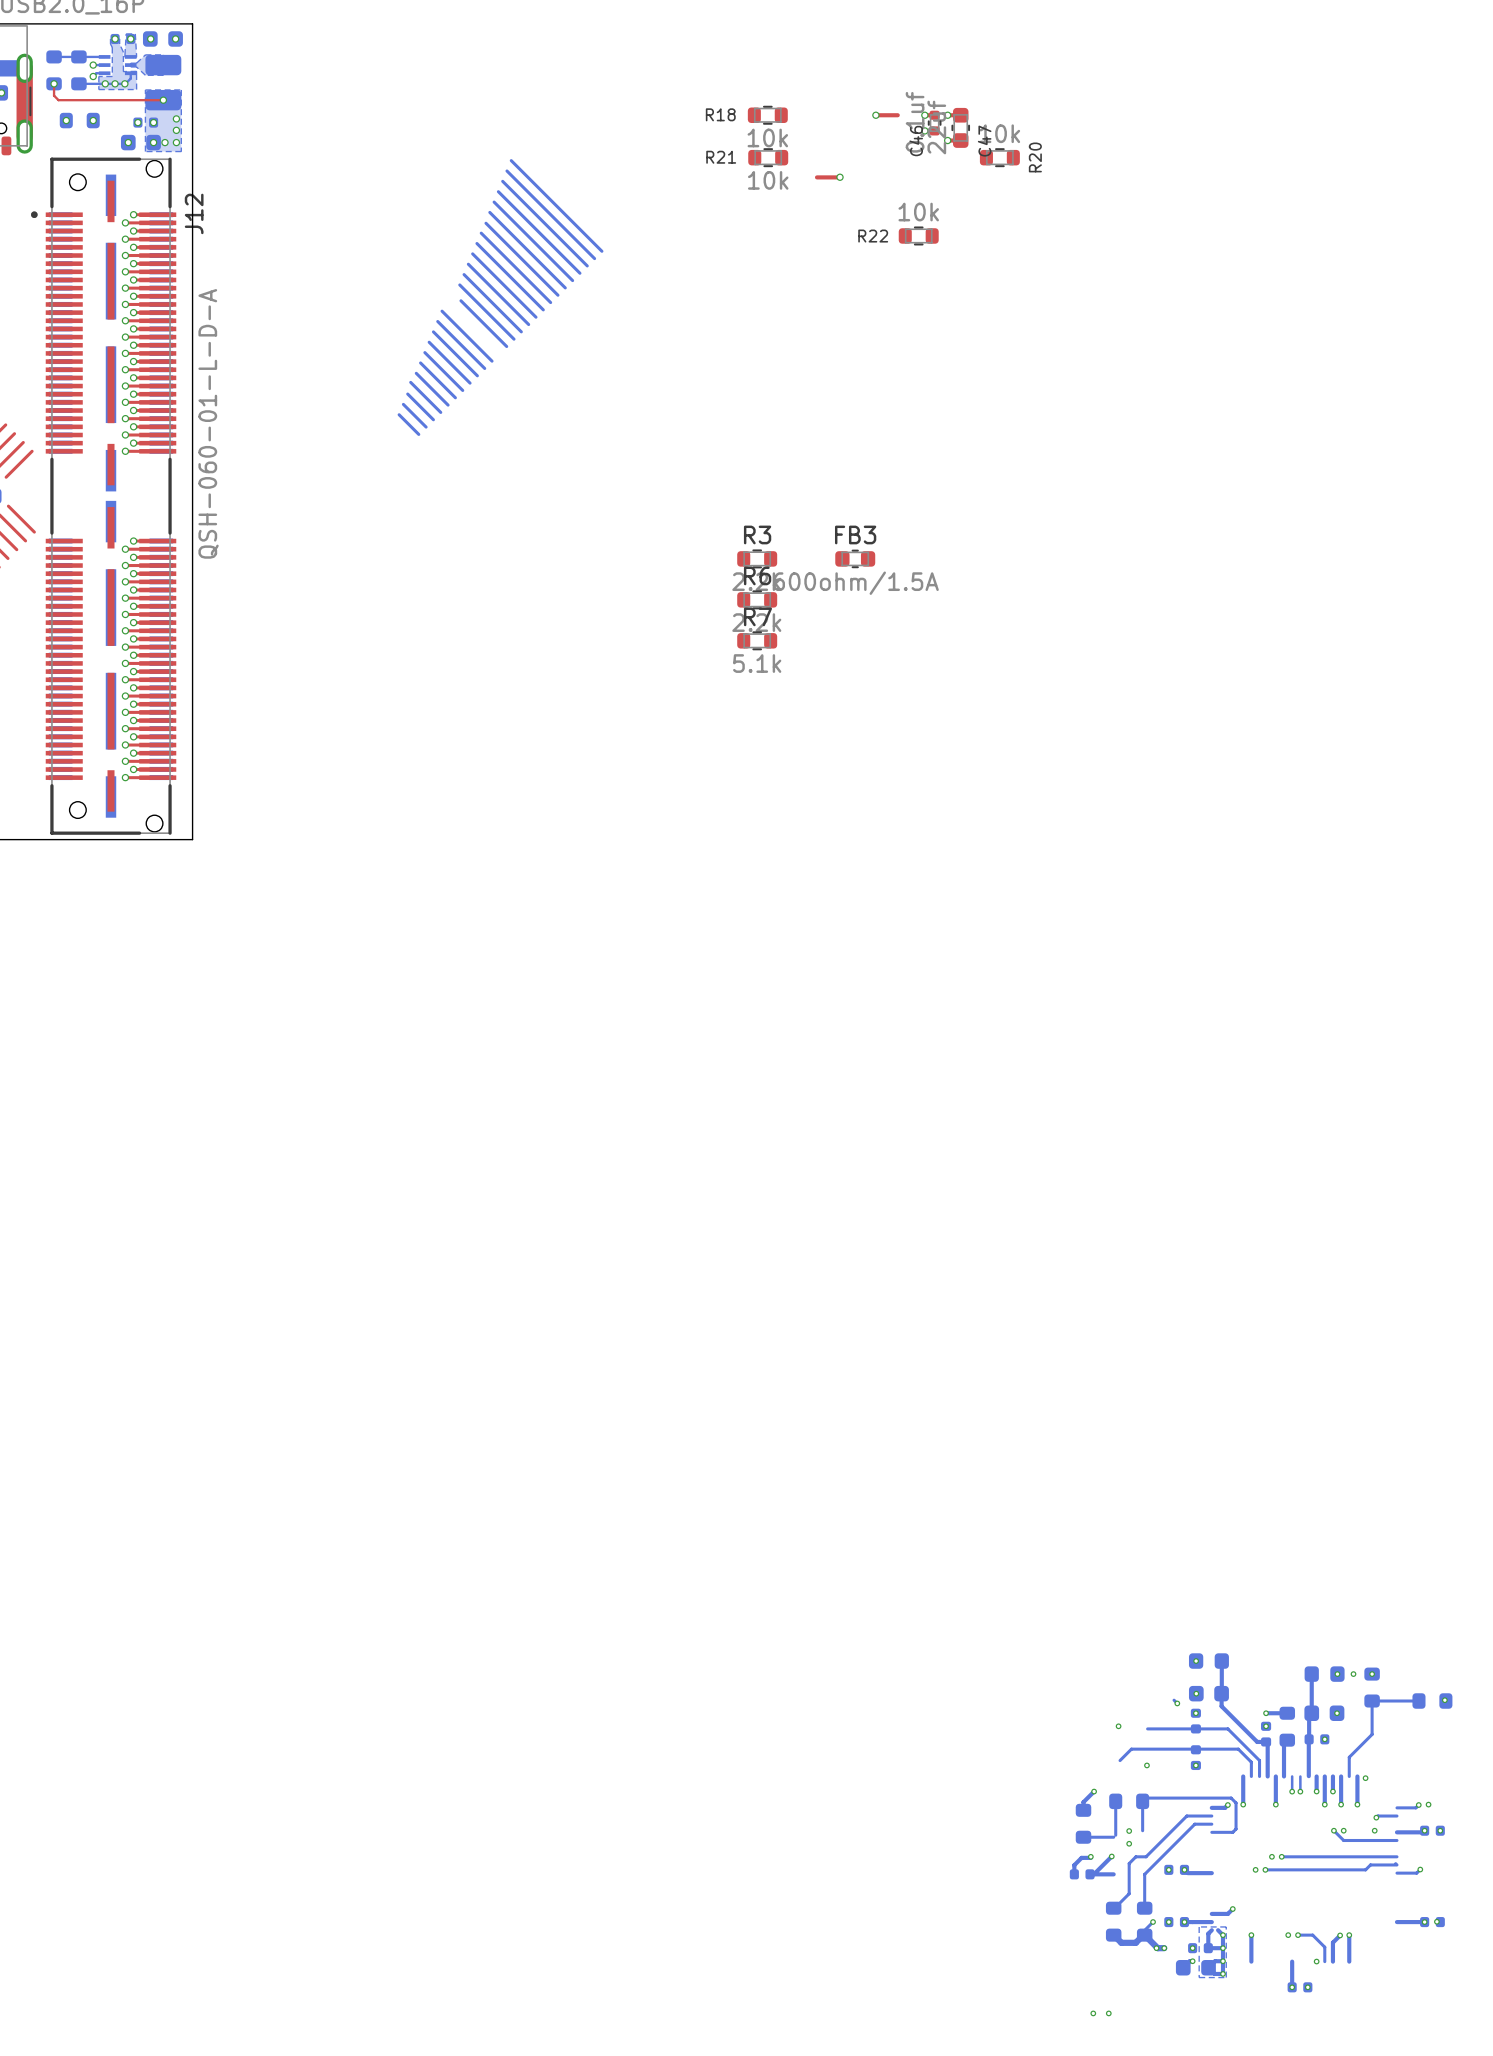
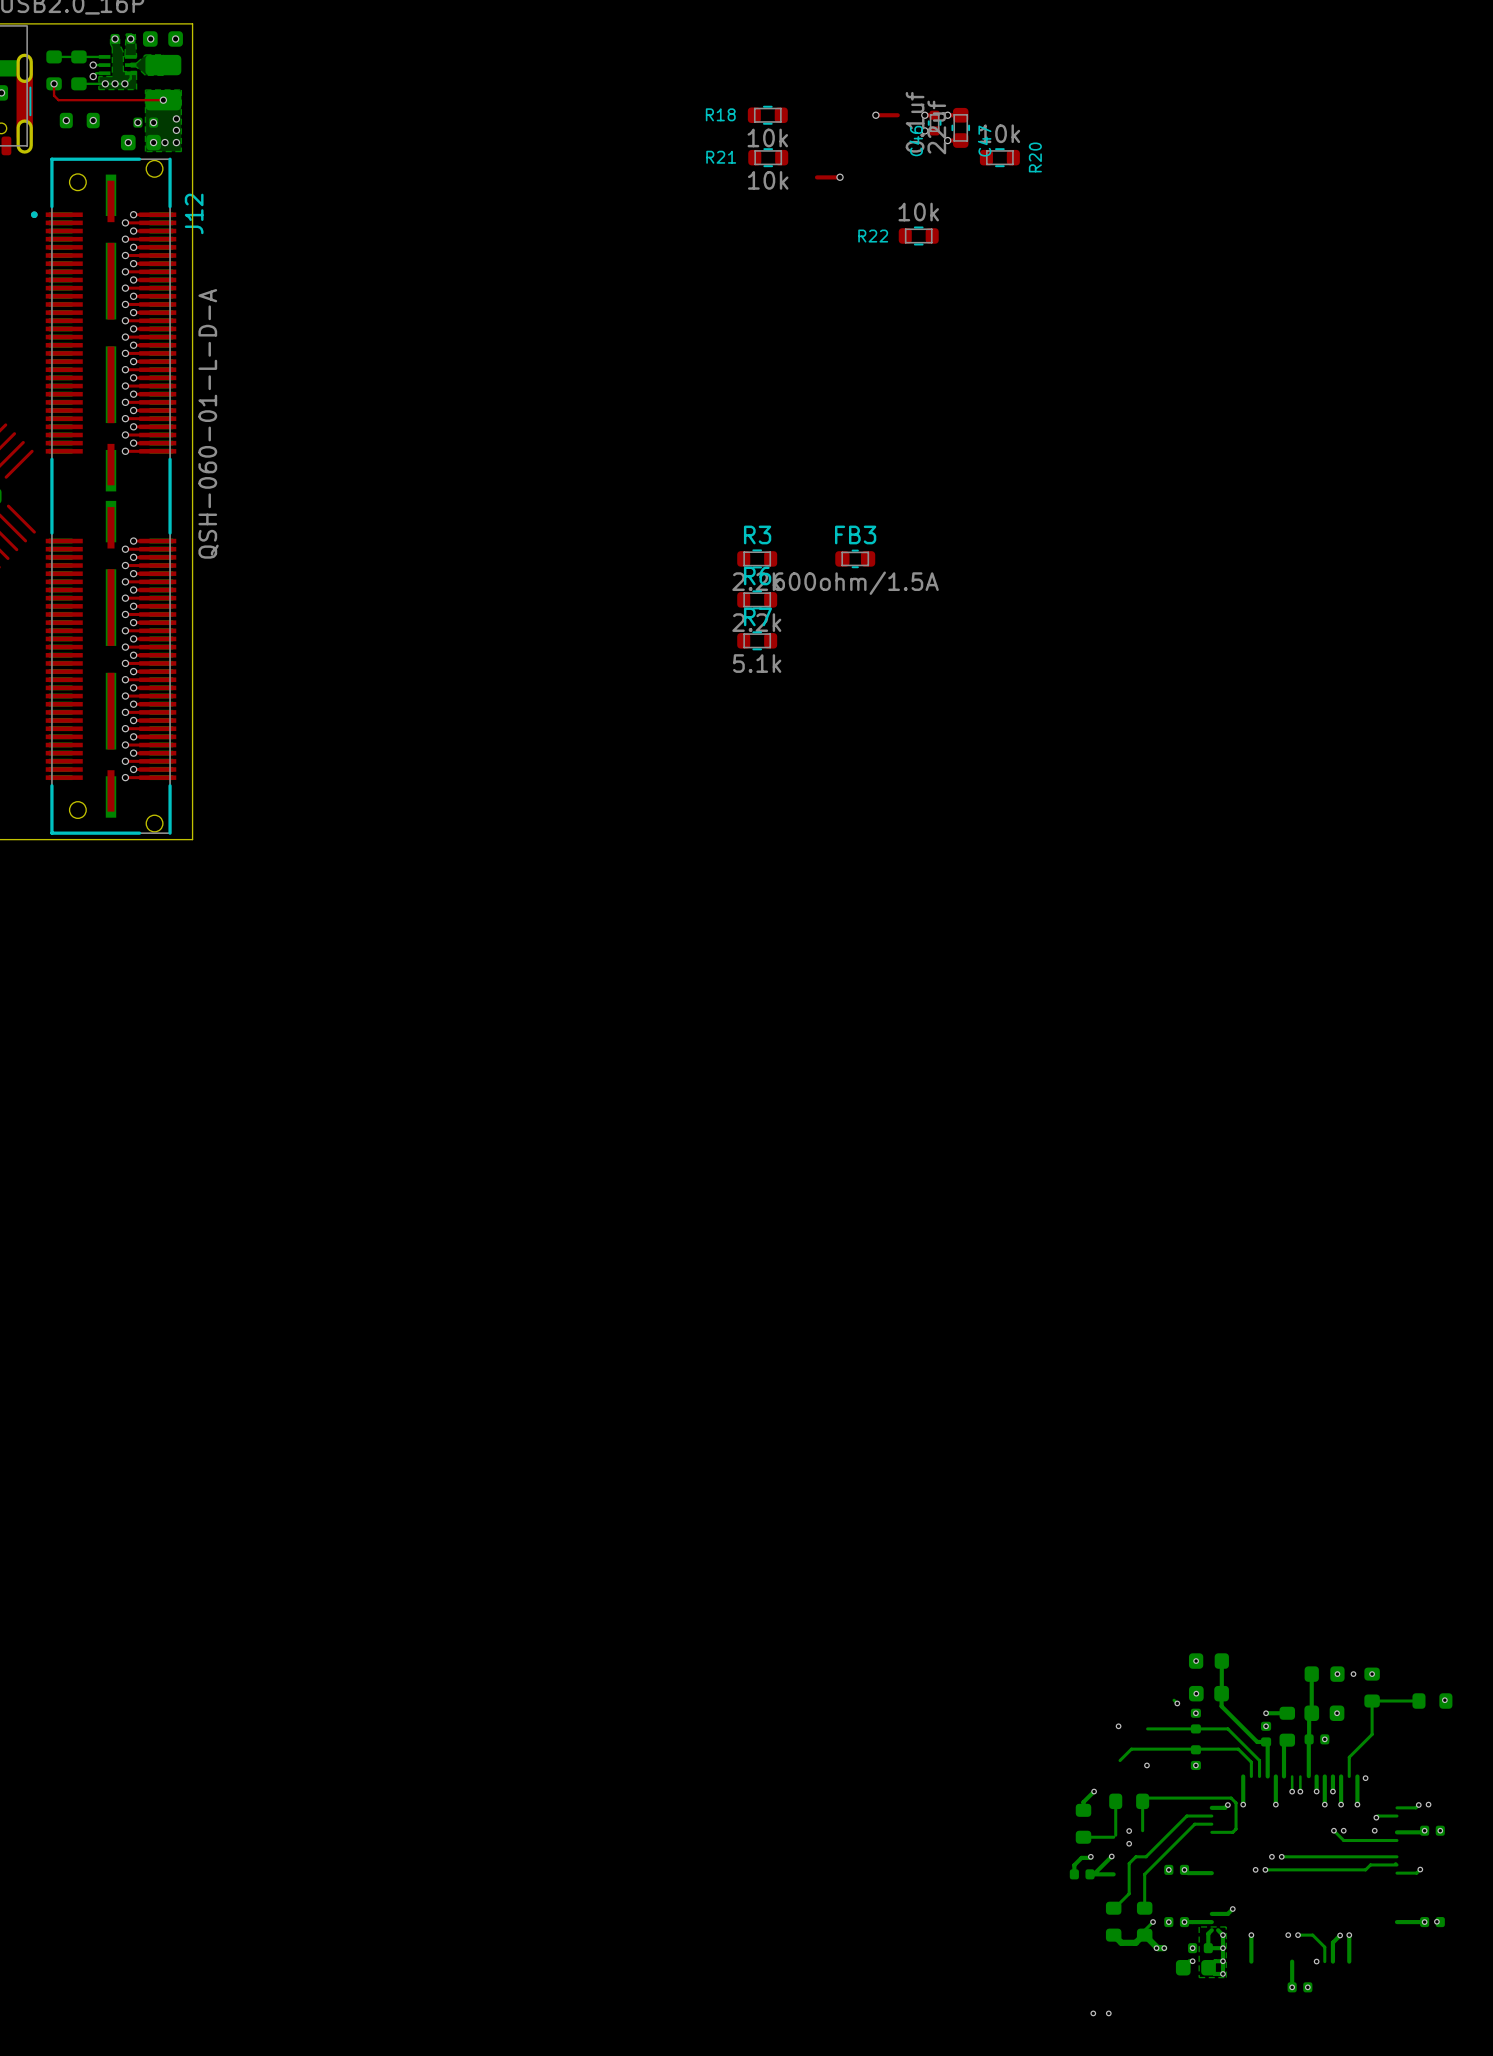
bottom track: (511, 160) (601, 251) -> none
bottom track: (506, 170) (594, 258) -> none
bottom track: (502, 181) (587, 265) -> none
bottom track: (498, 191) (579, 273) -> none
bottom track: (494, 202) (572, 280) -> none
bottom track: (489, 212) (565, 287) -> none
bottom track: (485, 223) (557, 295) -> none
bottom track: (481, 233) (550, 302) -> none
bottom track: (476, 243) (543, 309) -> none
bottom track: (472, 253) (535, 317) -> none
bottom track: (468, 264) (528, 324) -> none
bottom track: (464, 274) (521, 331) -> none
bottom track: (459, 284) (514, 339) -> none
bottom track: (460, 300) (506, 346) -> none
bottom track: (442, 311) (492, 361) -> none
bottom track: (437, 321) (484, 368) -> none
bottom track: (433, 331) (477, 375) -> none
bottom track: (429, 342) (470, 383) -> none
bottom track: (424, 352) (462, 390) -> none
bottom track: (420, 362) (455, 397) -> none
bottom track: (416, 373) (448, 405) -> none
bottom track: (410, 382) (440, 412) -> none
bottom track: (407, 394) (433, 419) -> none
bottom track: (403, 404) (426, 427) -> none
bottom track: (399, 414) (418, 434) -> none

